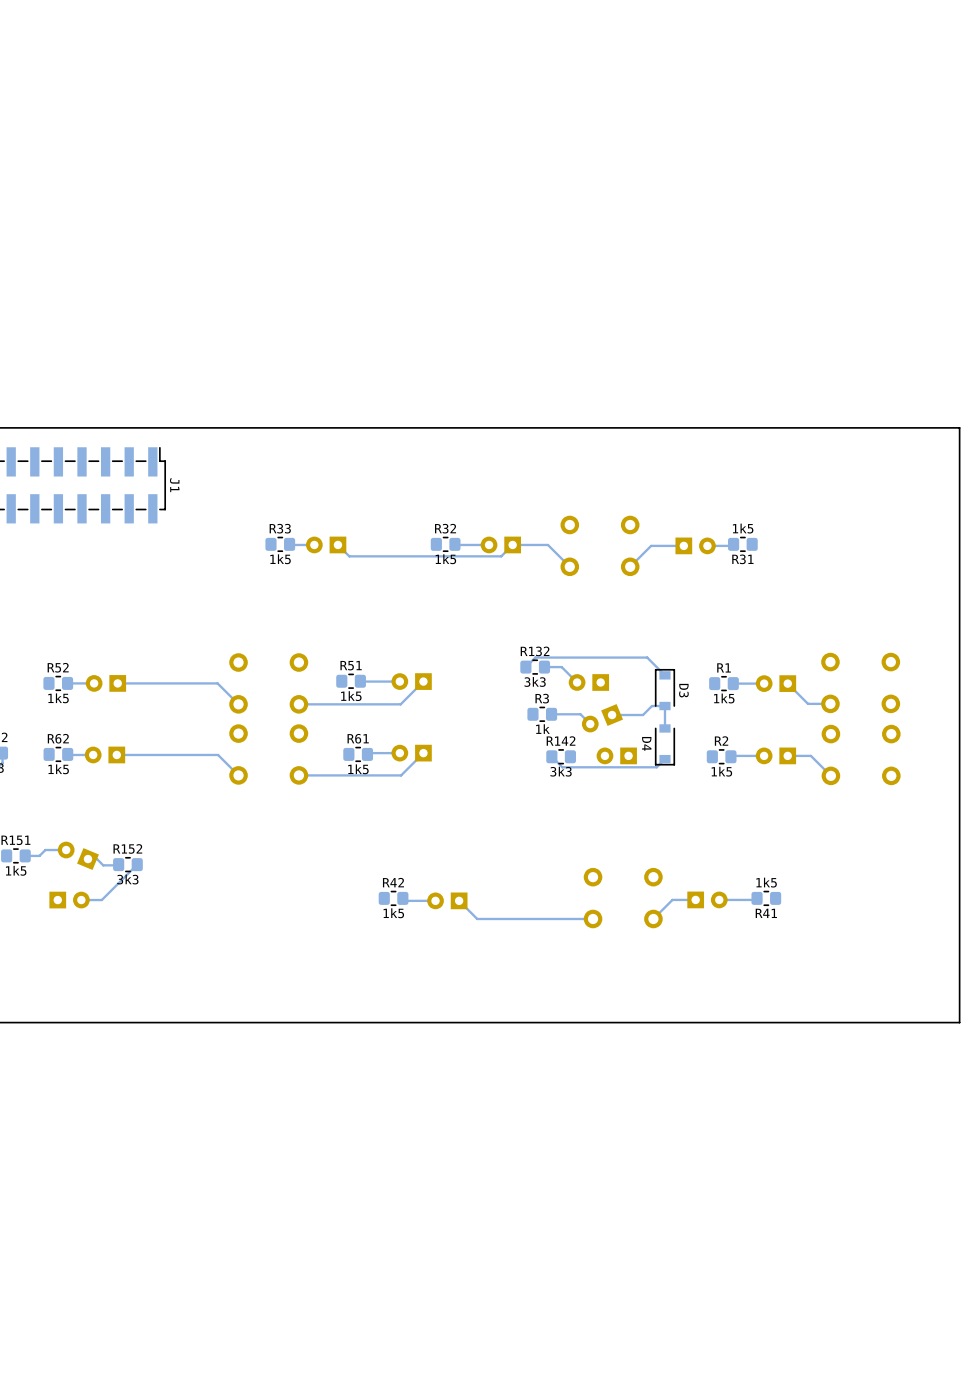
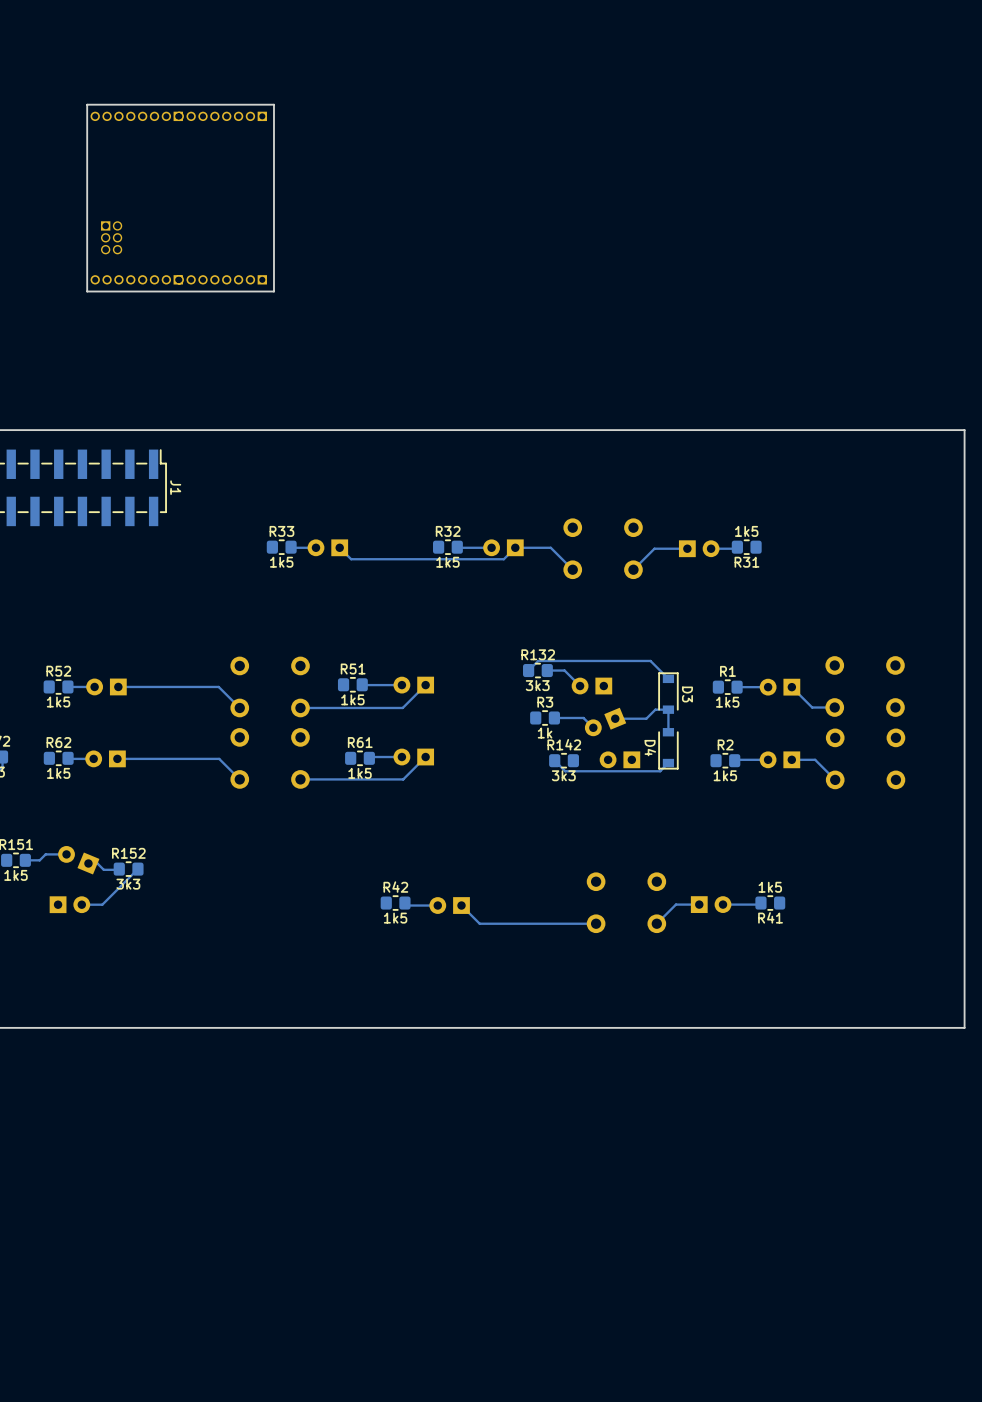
board edge: none -> (273, 104) (87, 104) (87, 291) (273, 291) (273, 104)
part: none -> (136, 116)
part: none -> (220, 116)
part: none -> (111, 237)
part: none -> (136, 279)
part: none -> (220, 279)

